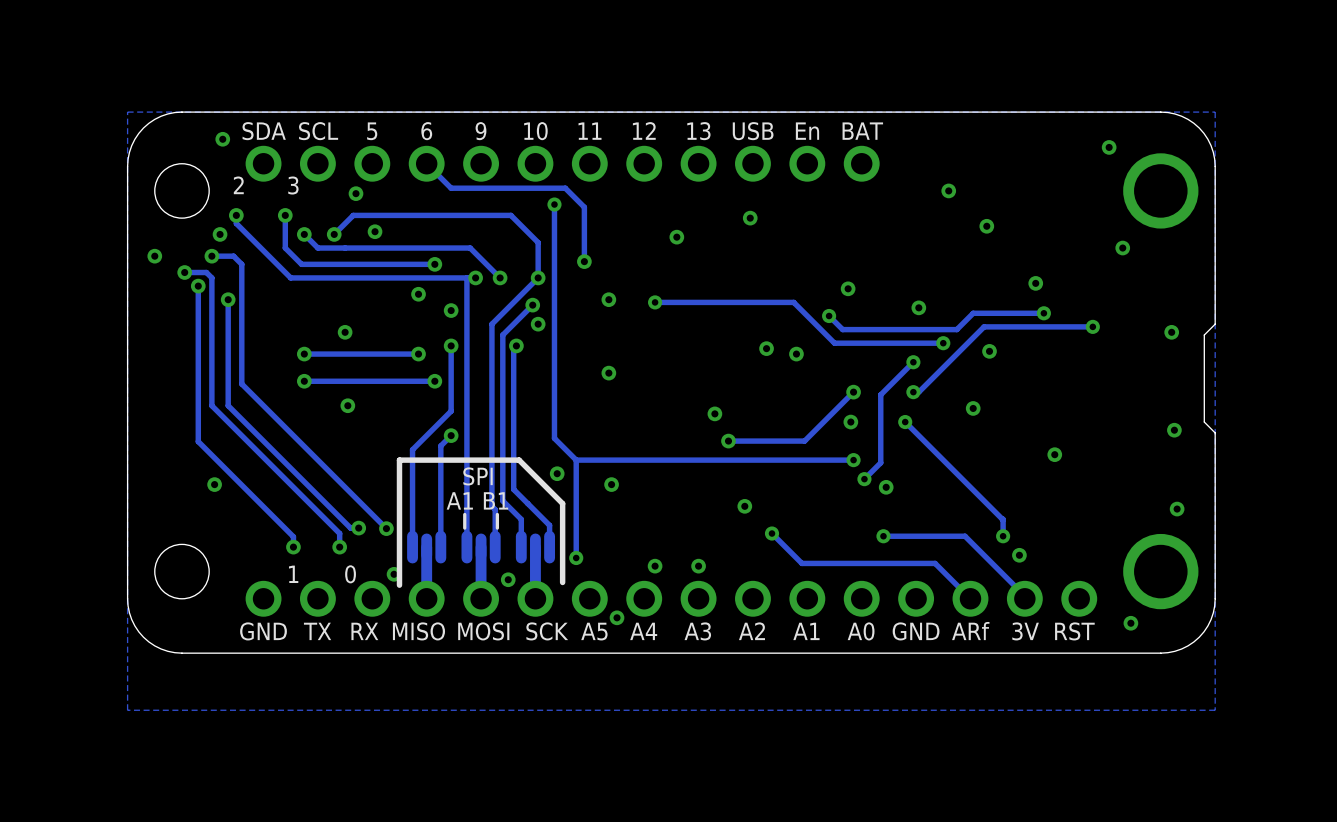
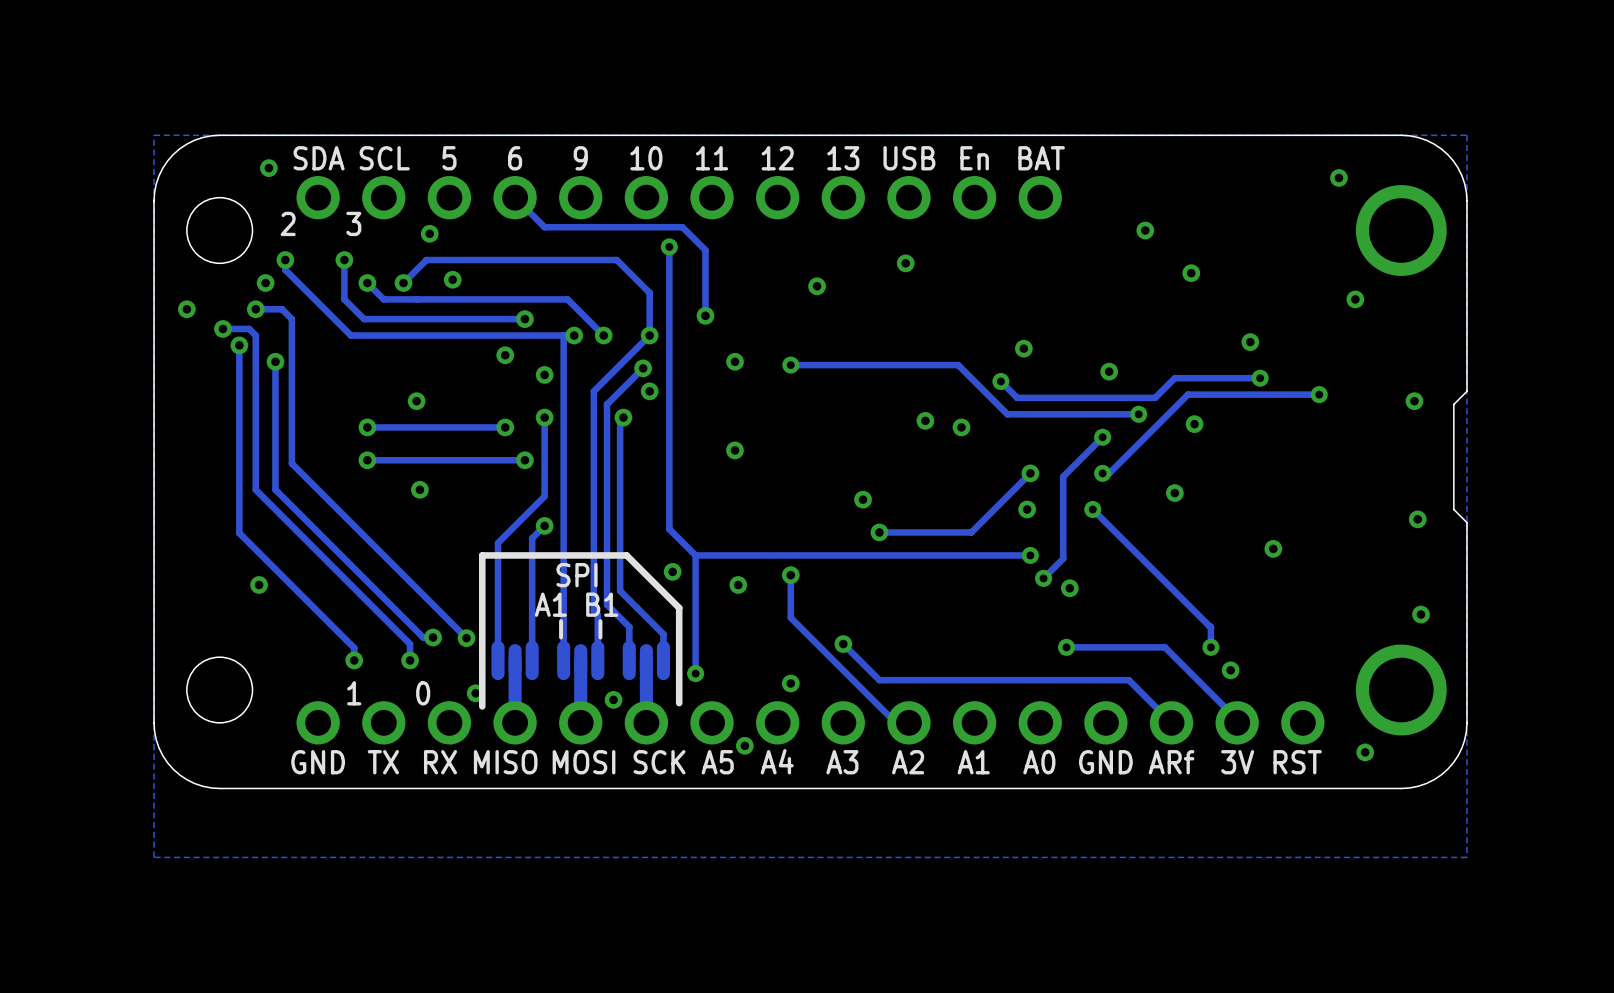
track: none -> (790, 575) (790, 617) (895, 722) (908, 722)
via: none -> (790, 575)
via: (744, 506) -> none
via: none -> (843, 644)
track: (771, 533) (801, 563) -> (843, 644) (879, 680) (968, 680)
via: (771, 533) -> none
via: (698, 566) -> none

